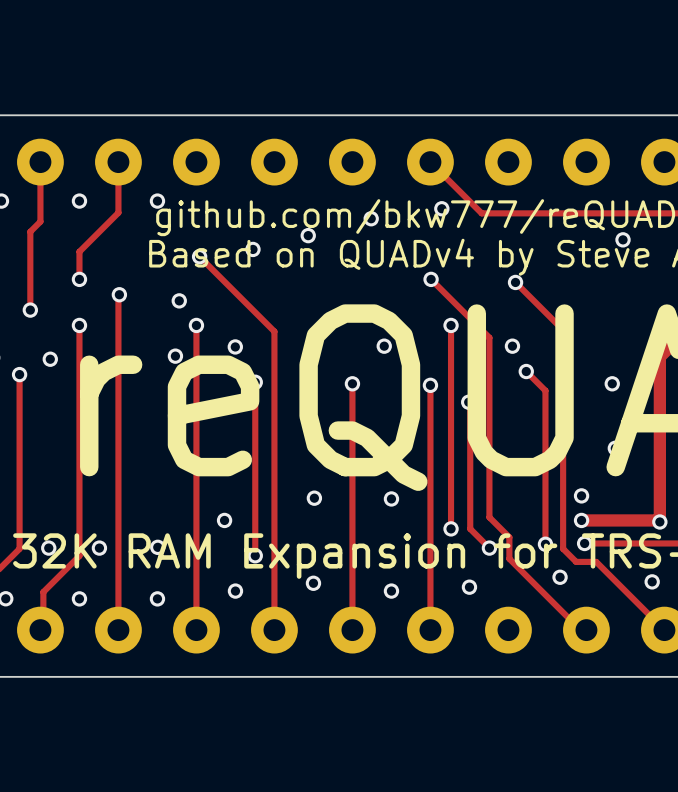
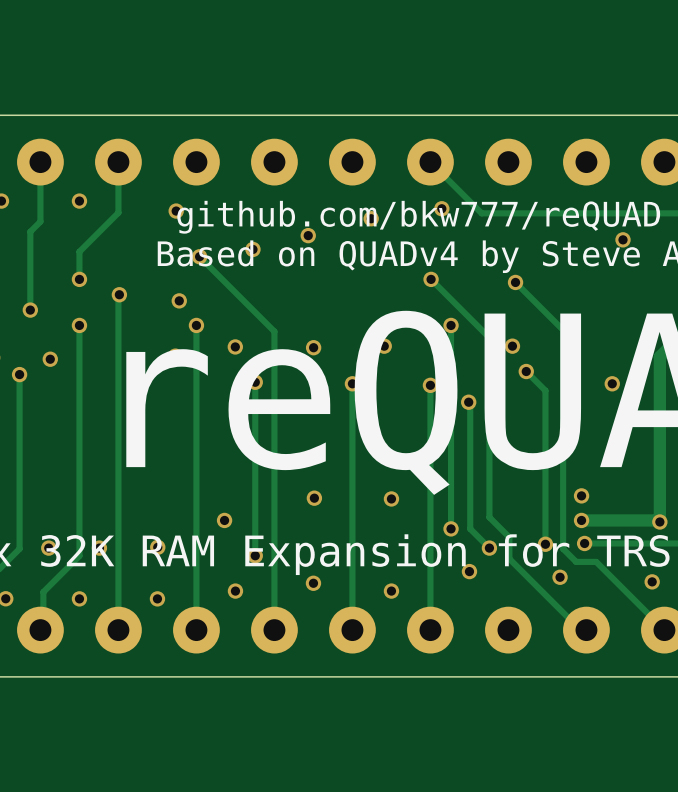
via position: (157, 201) -> (176, 211)
via position: (469, 587) -> (469, 571)

